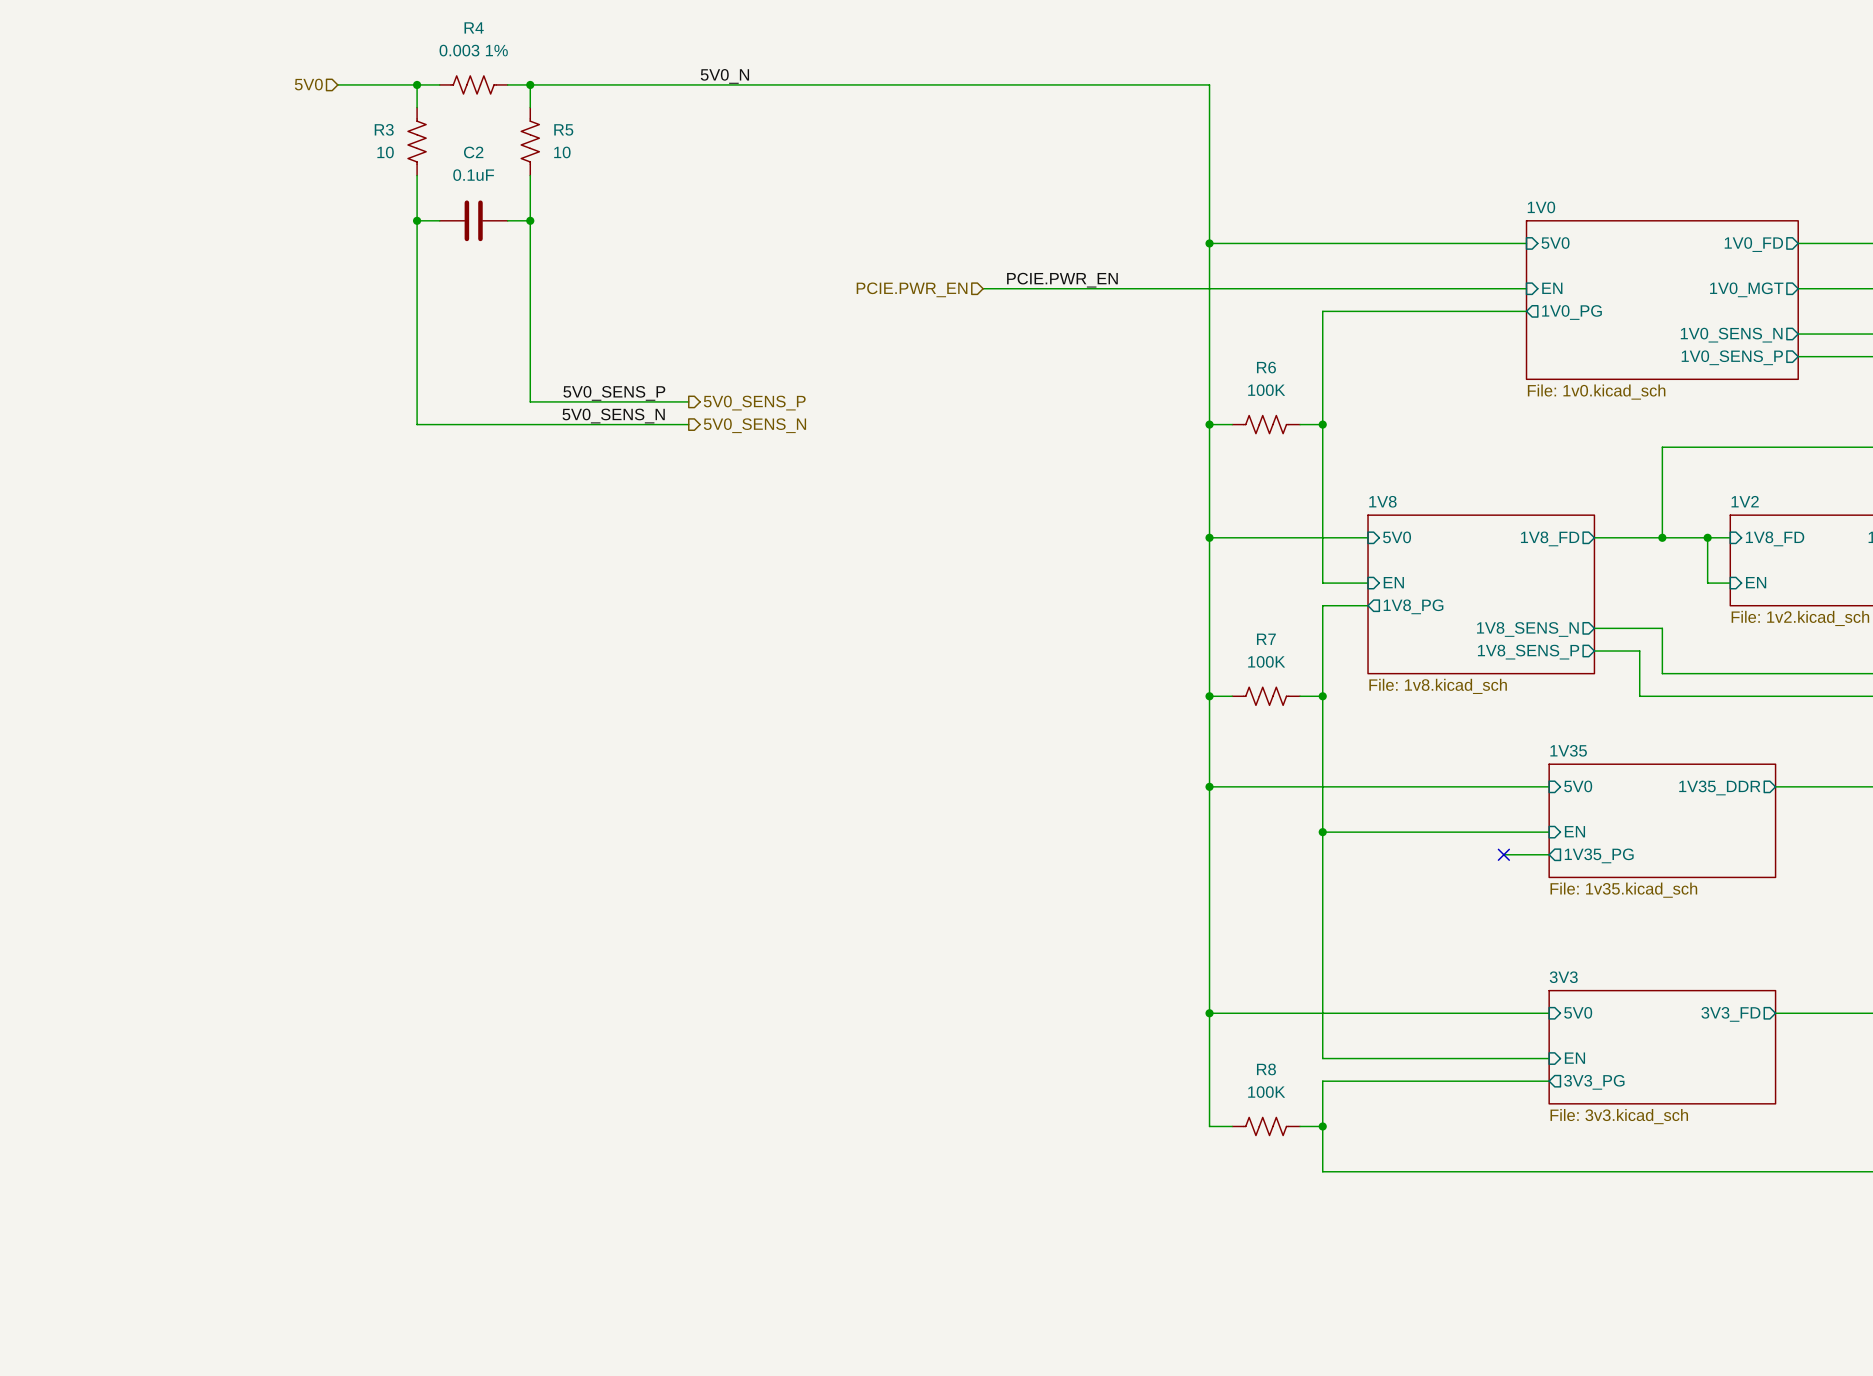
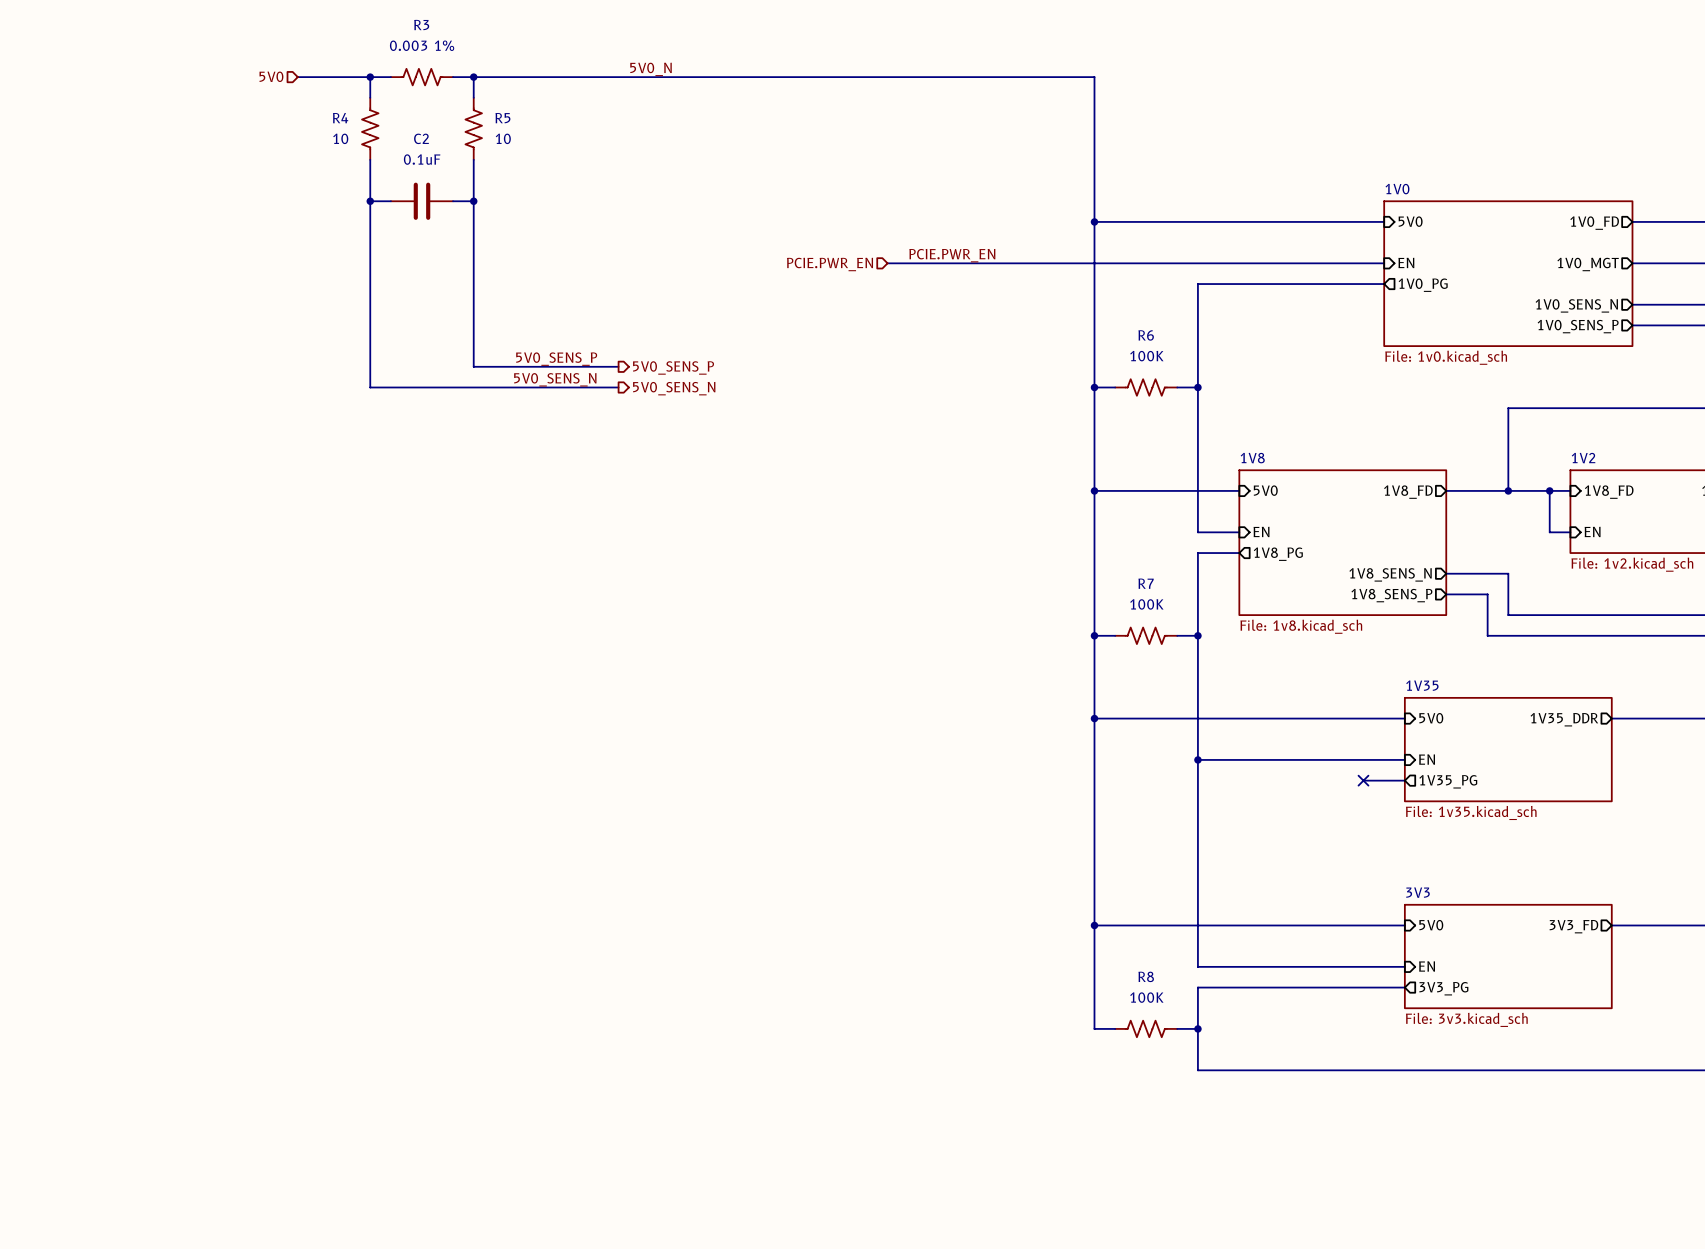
R4 name: R4 (474, 27) -> R3 (421, 25)
R3 name: R3 (384, 129) -> R4 (340, 118)

